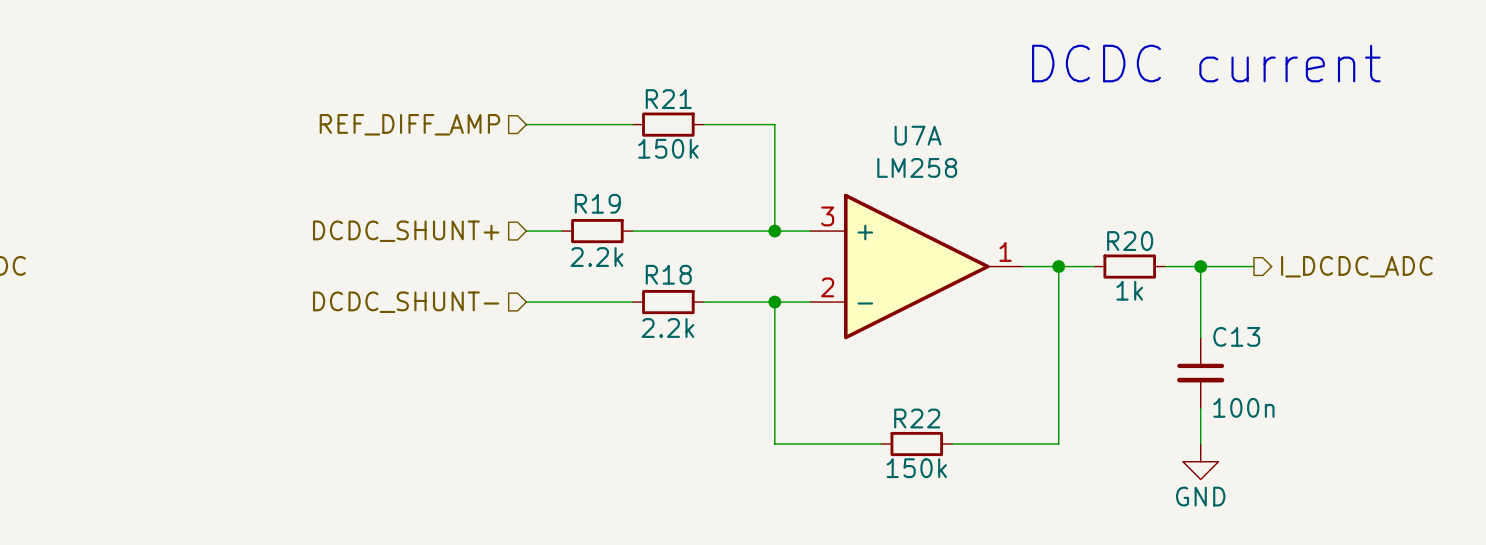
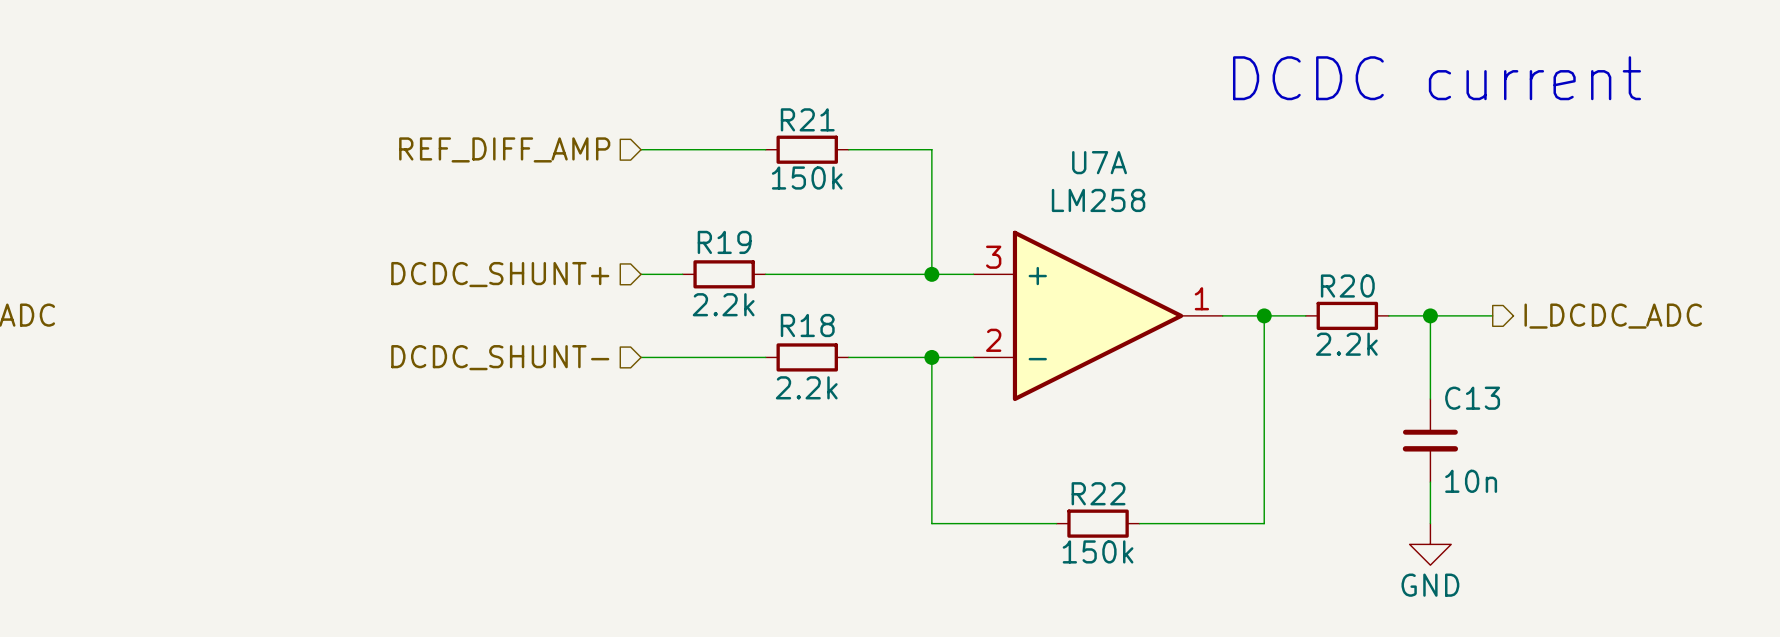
R20 value: 1k (1129, 290) -> 2.2k (1346, 344)
C13 value: 100n (1243, 407) -> 10n (1471, 481)

